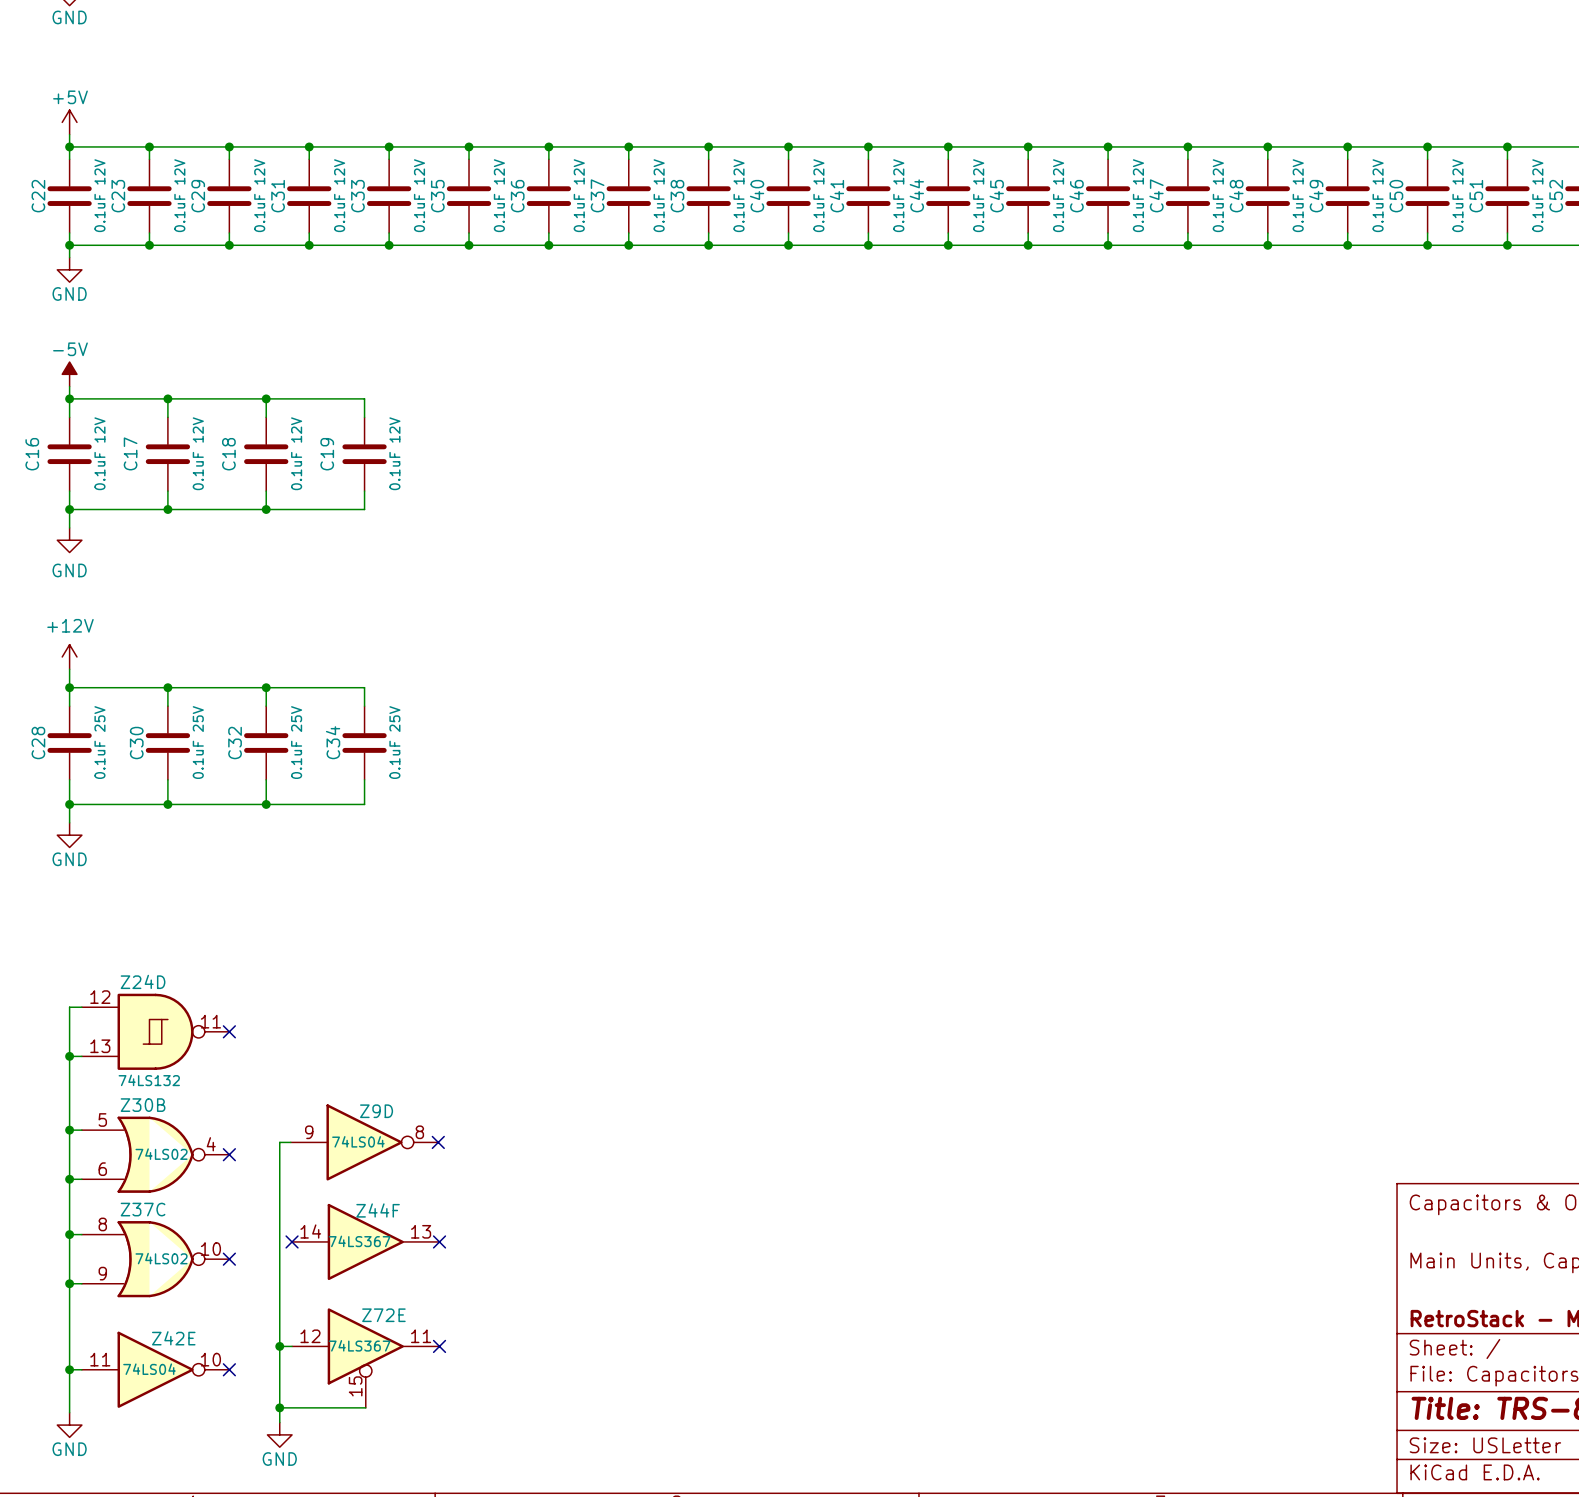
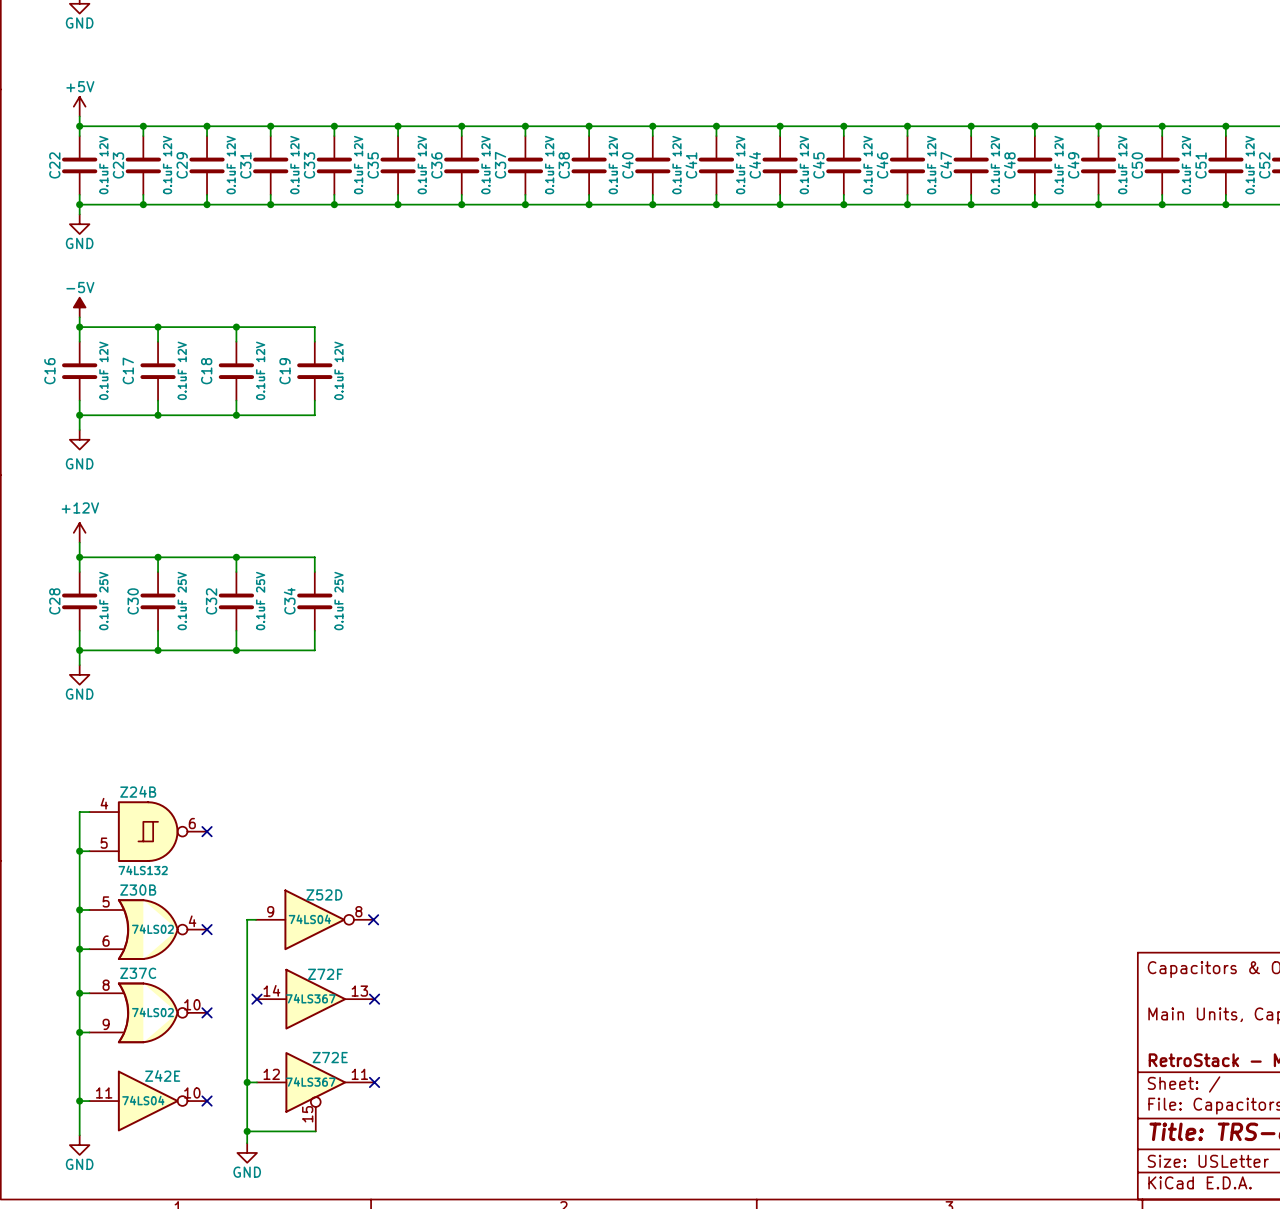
Z24D name: Z24D (143, 981) -> Z24B (138, 791)
Z24D pin number: 12 (100, 997) -> 4 (104, 803)
Z24D pin number: 11 (210, 1021) -> 6 (192, 823)
Z24D pin number: 13 (100, 1046) -> 5 (104, 843)
Z9D name: Z9D (376, 1111) -> Z52D (324, 894)
Z44F name: Z44F (378, 1210) -> Z72F (325, 974)

